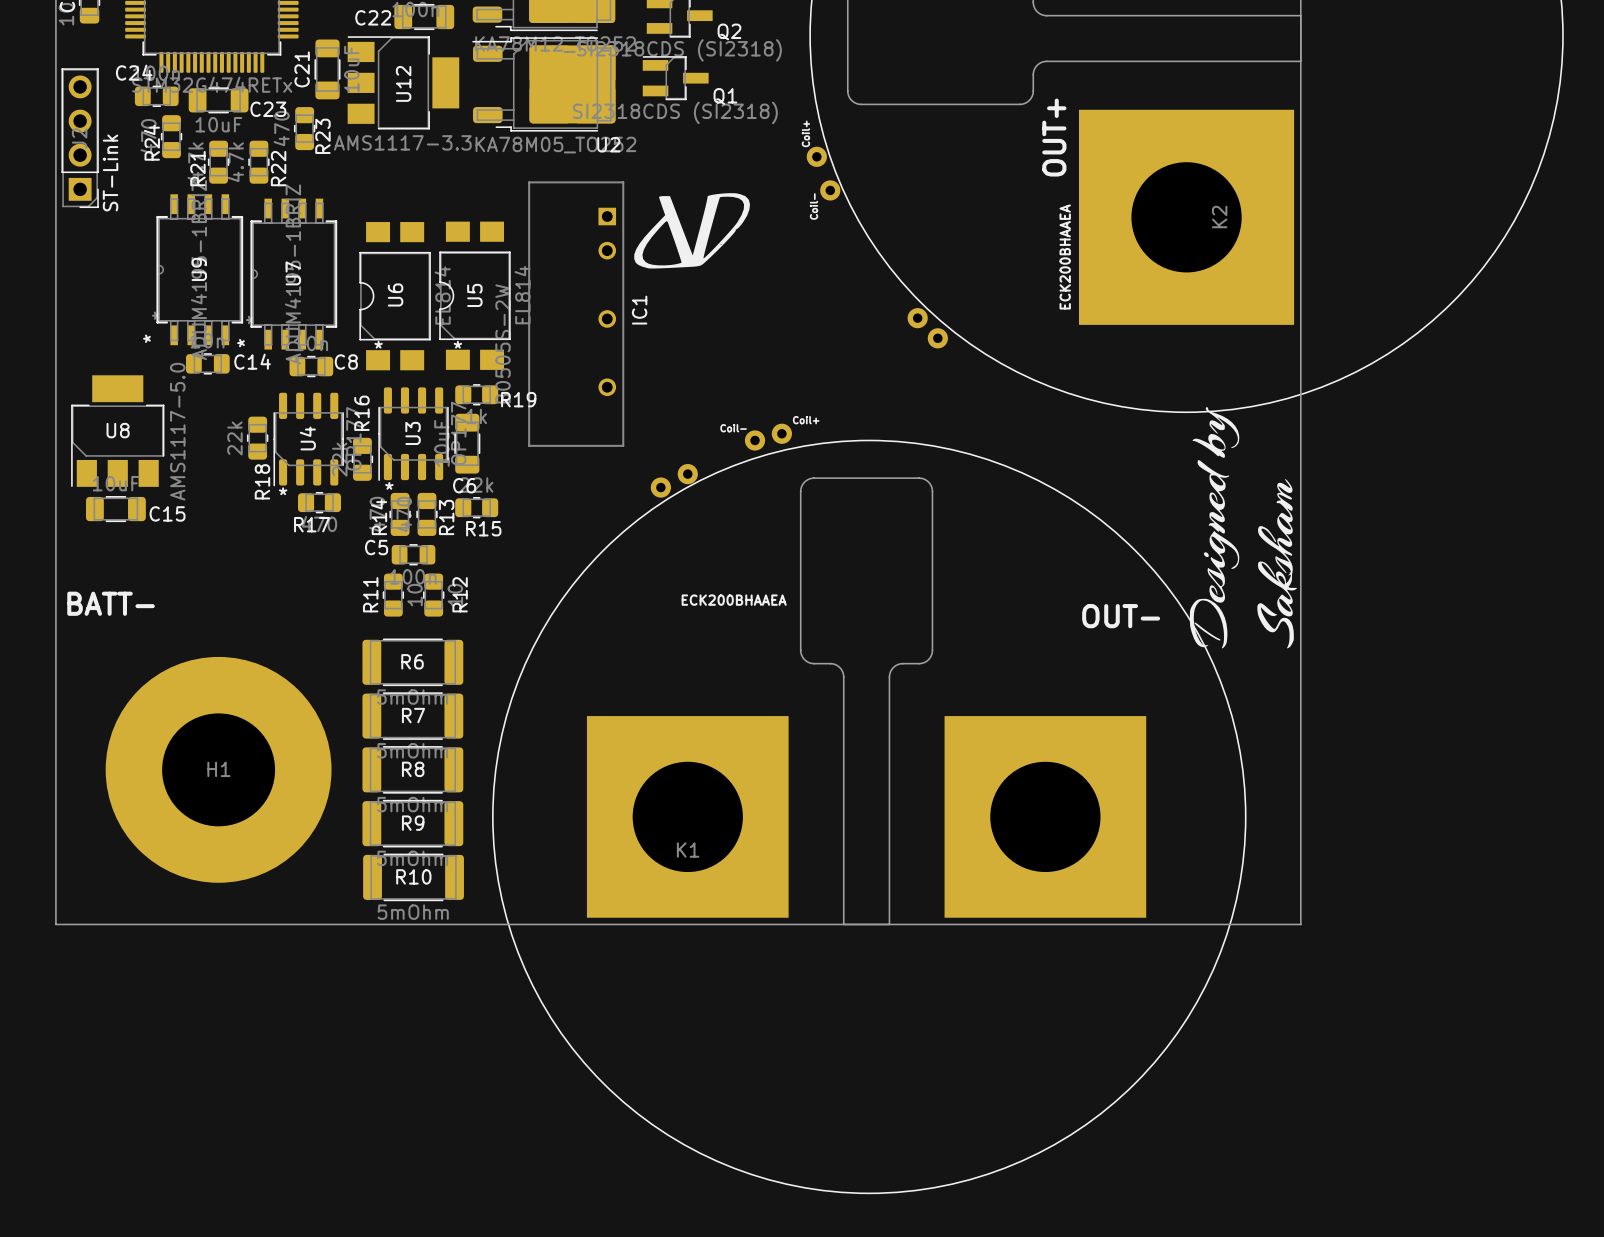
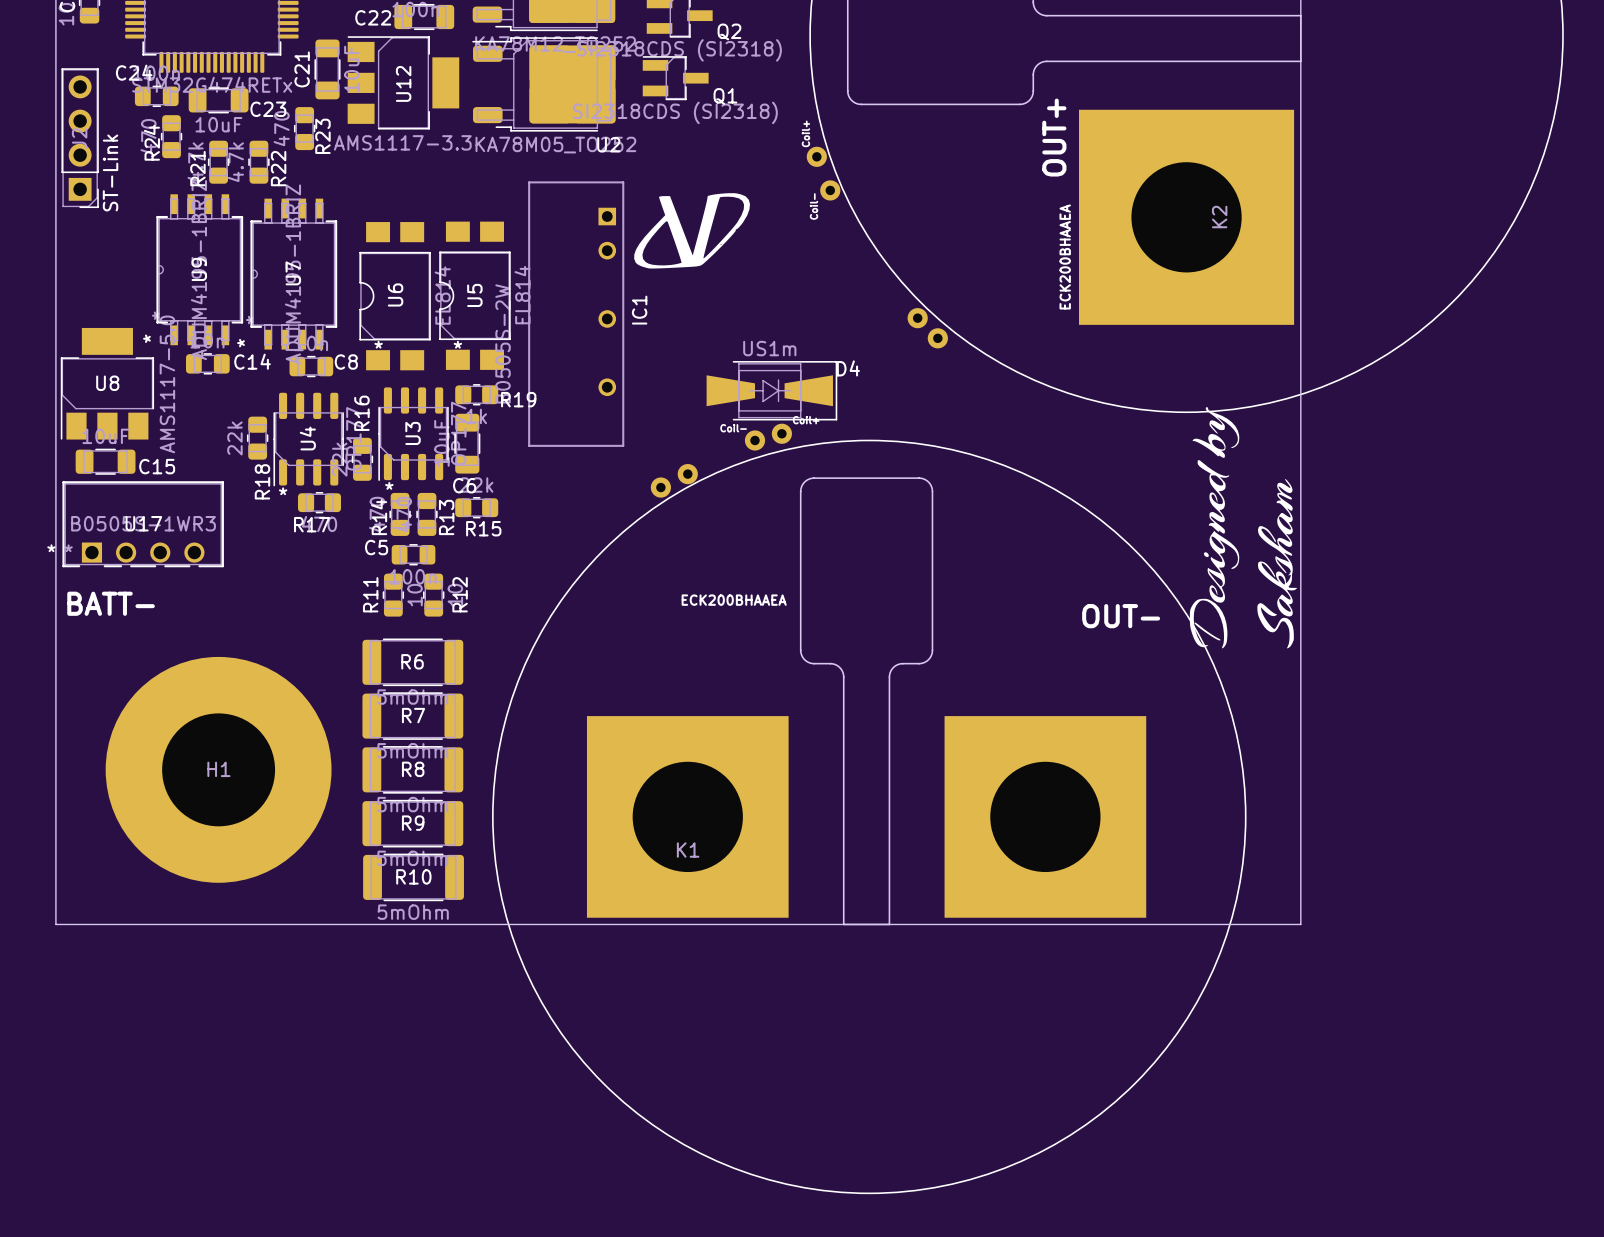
D4: none -> US1m (771, 390)
U8 position: (117, 431) -> (107, 383)
C15 position: (115, 509) -> (105, 461)
U17: none -> B0505S-1WR3 (143, 524)

